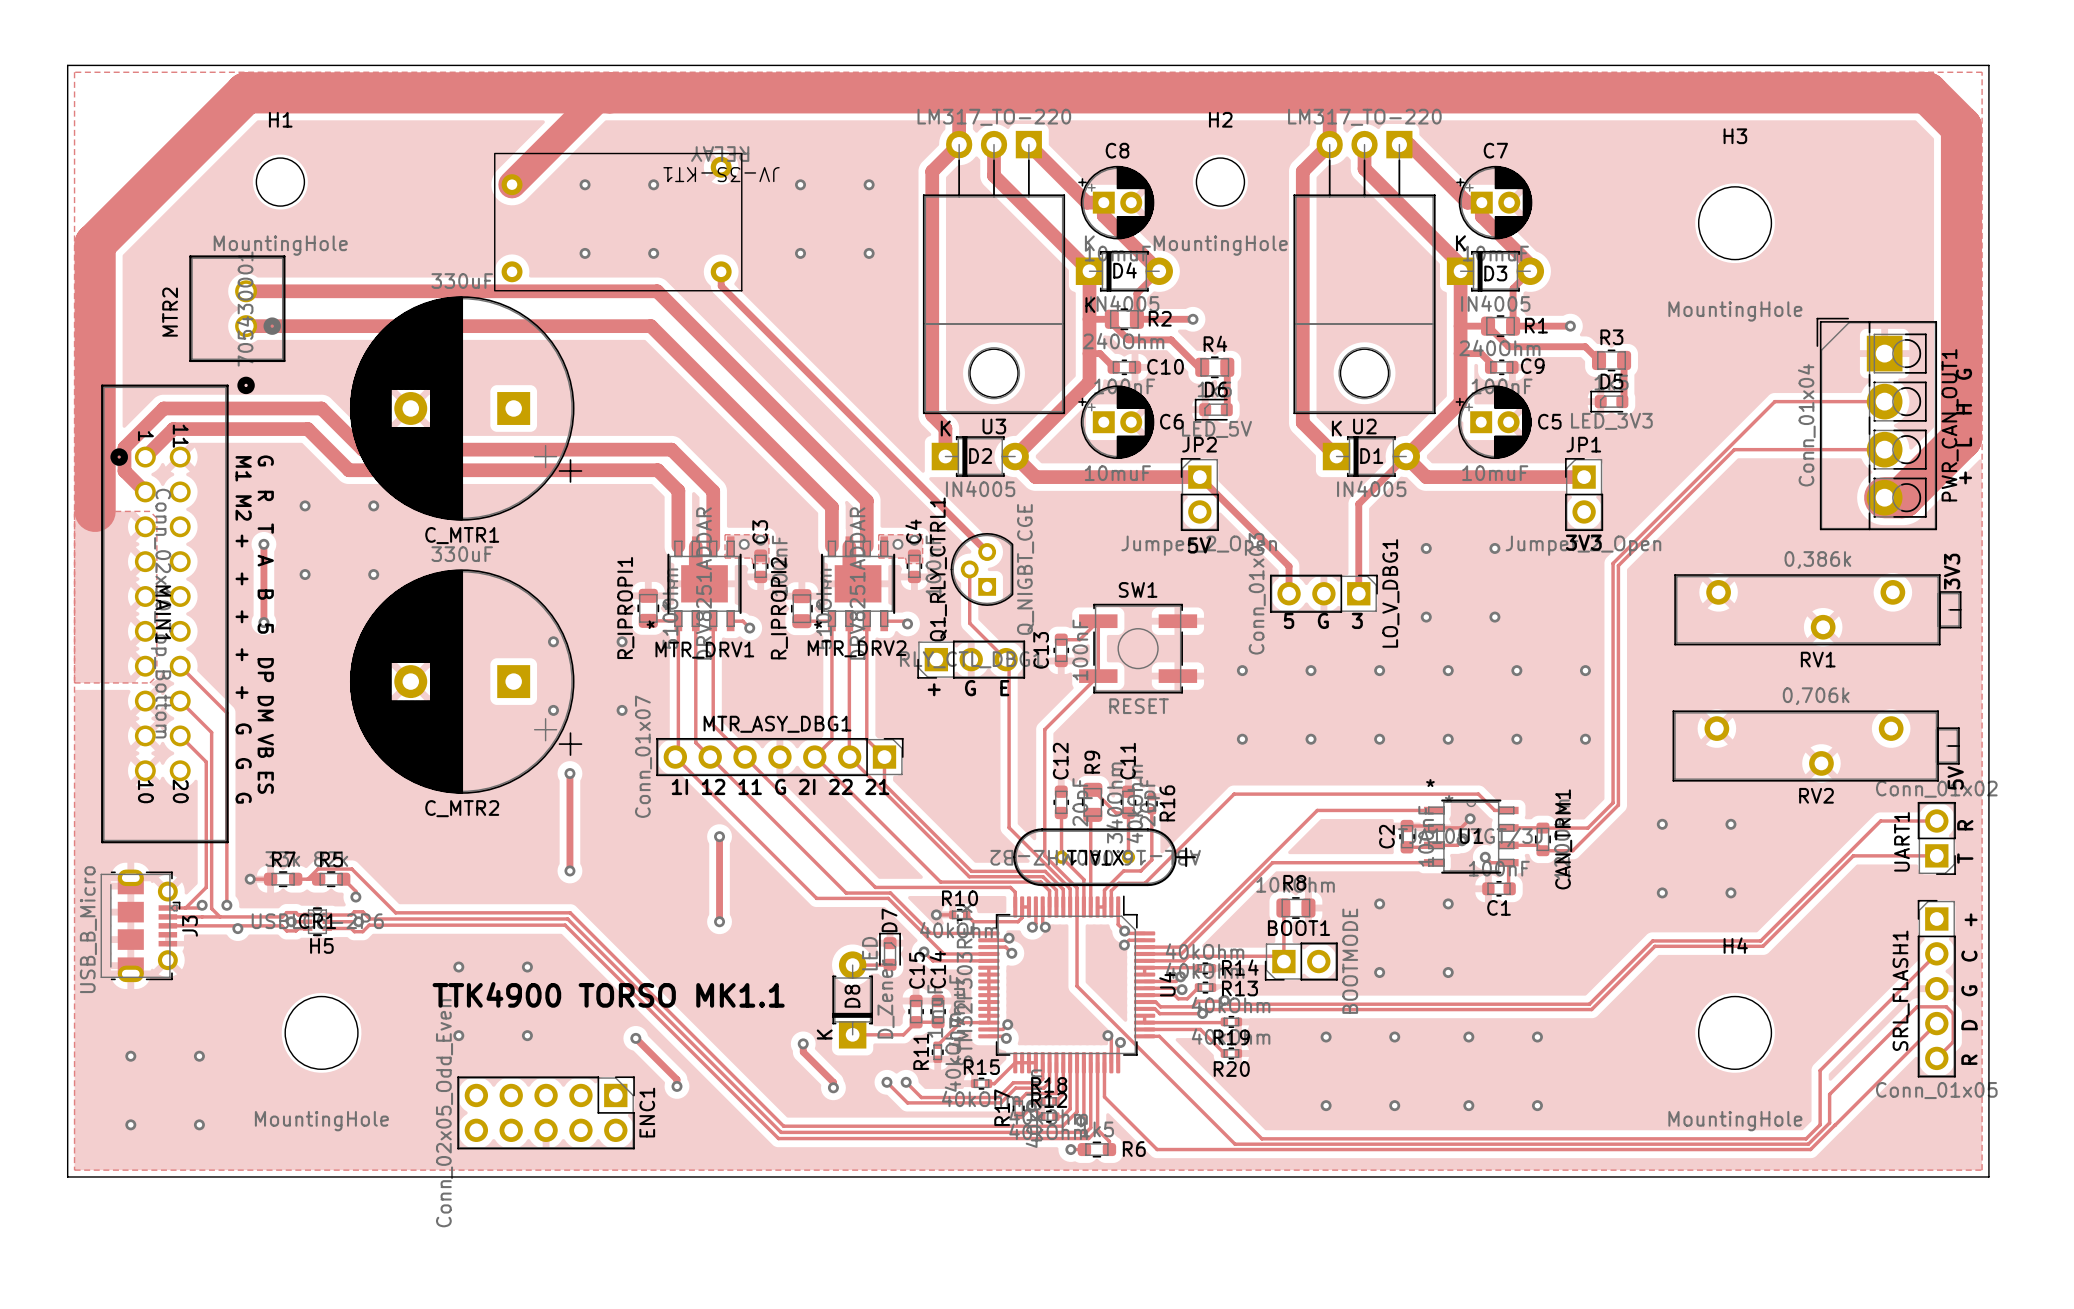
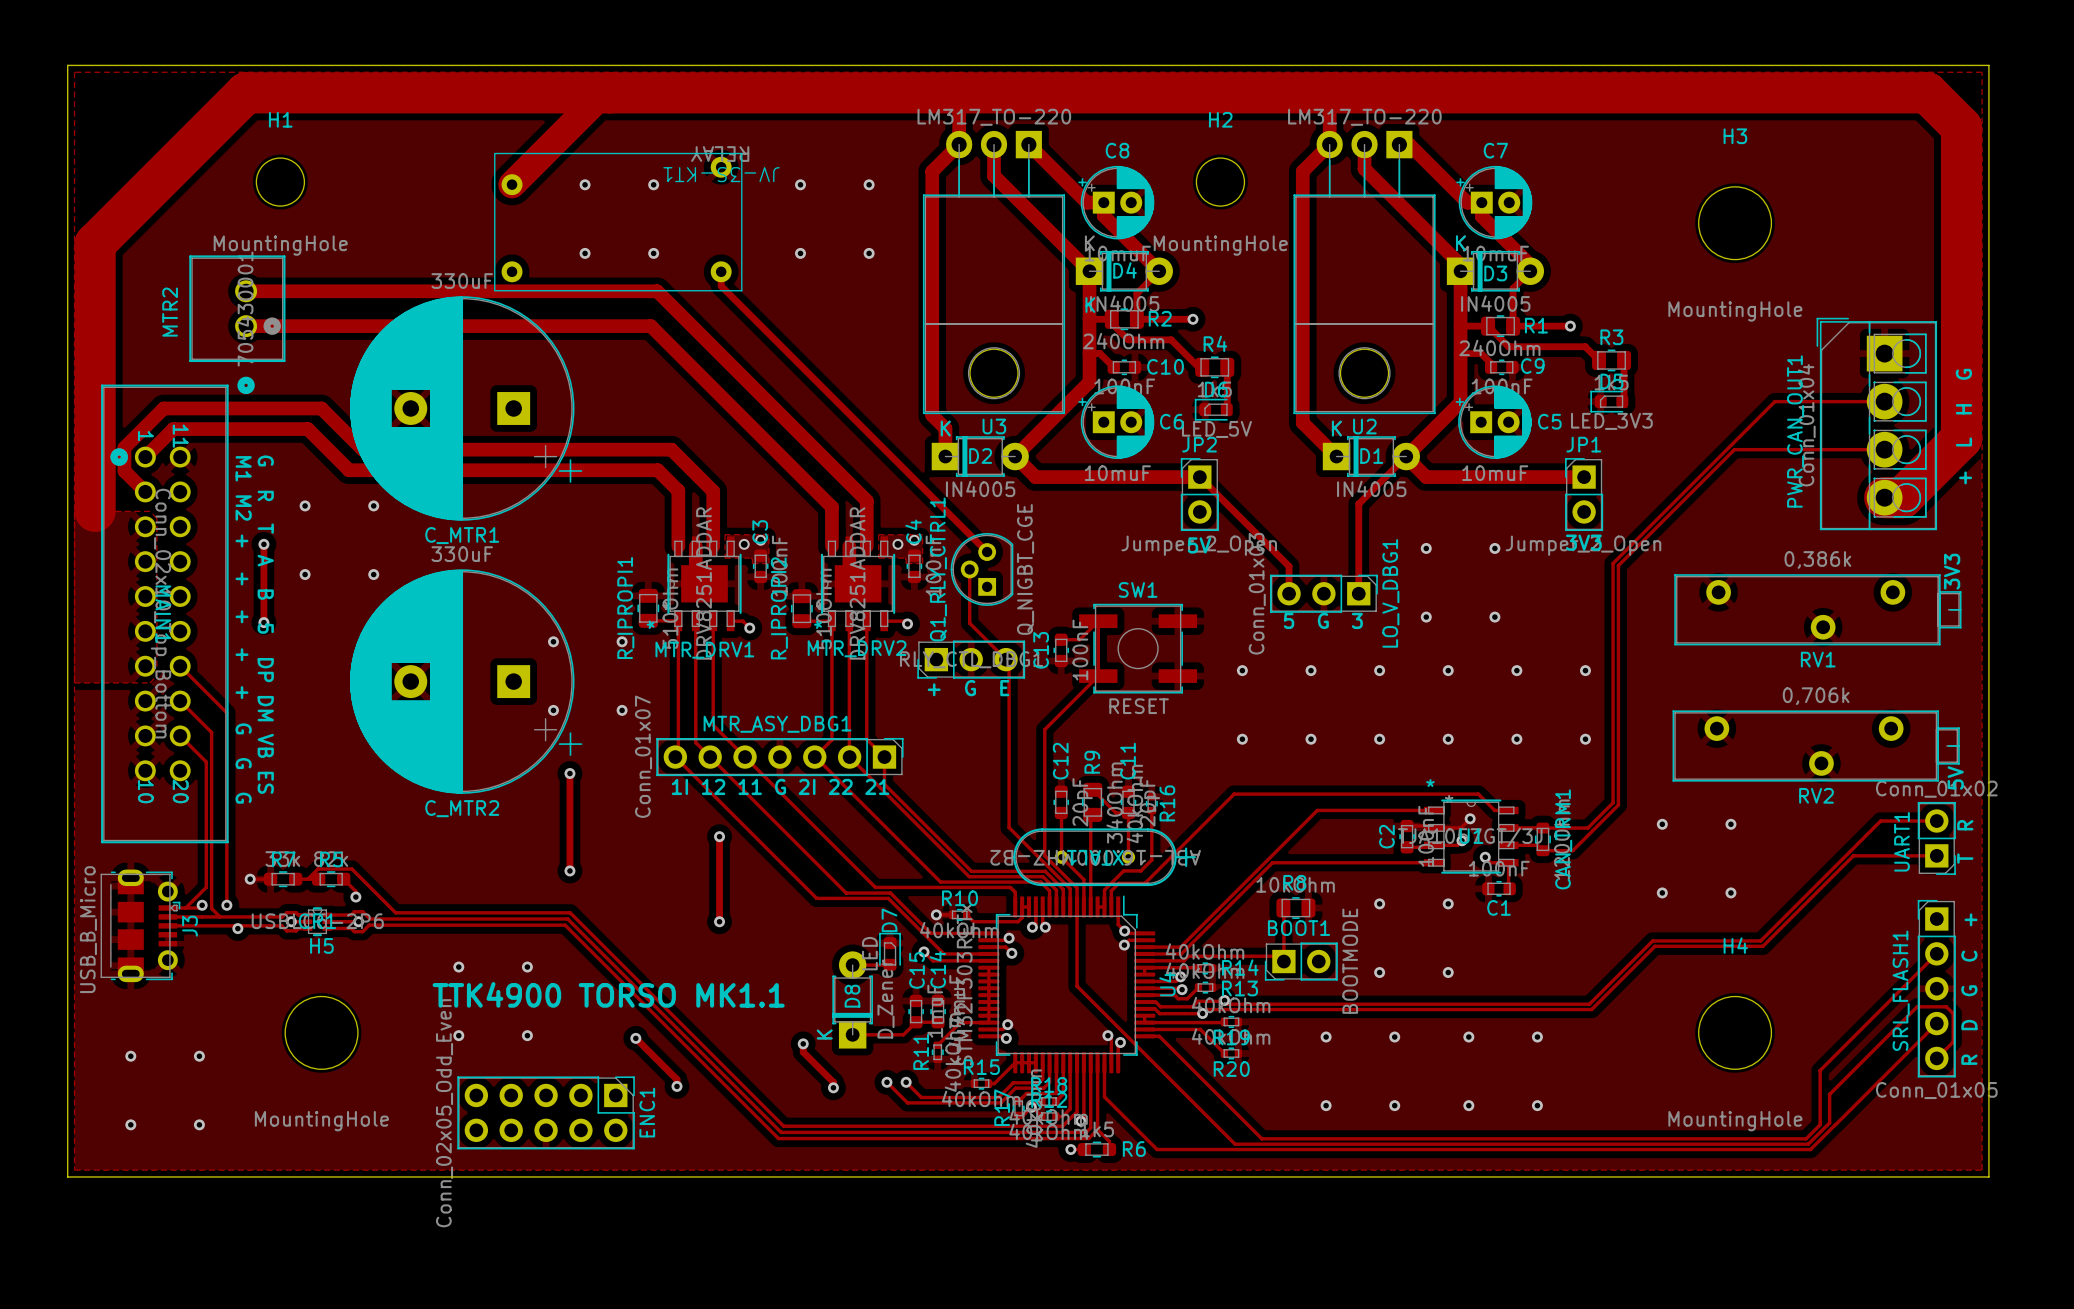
PWR_CAN_OUT1 name position: PWR_CAN_OUT1 (1950, 425) -> PWR_CAN_OUT1 (1795, 431)

